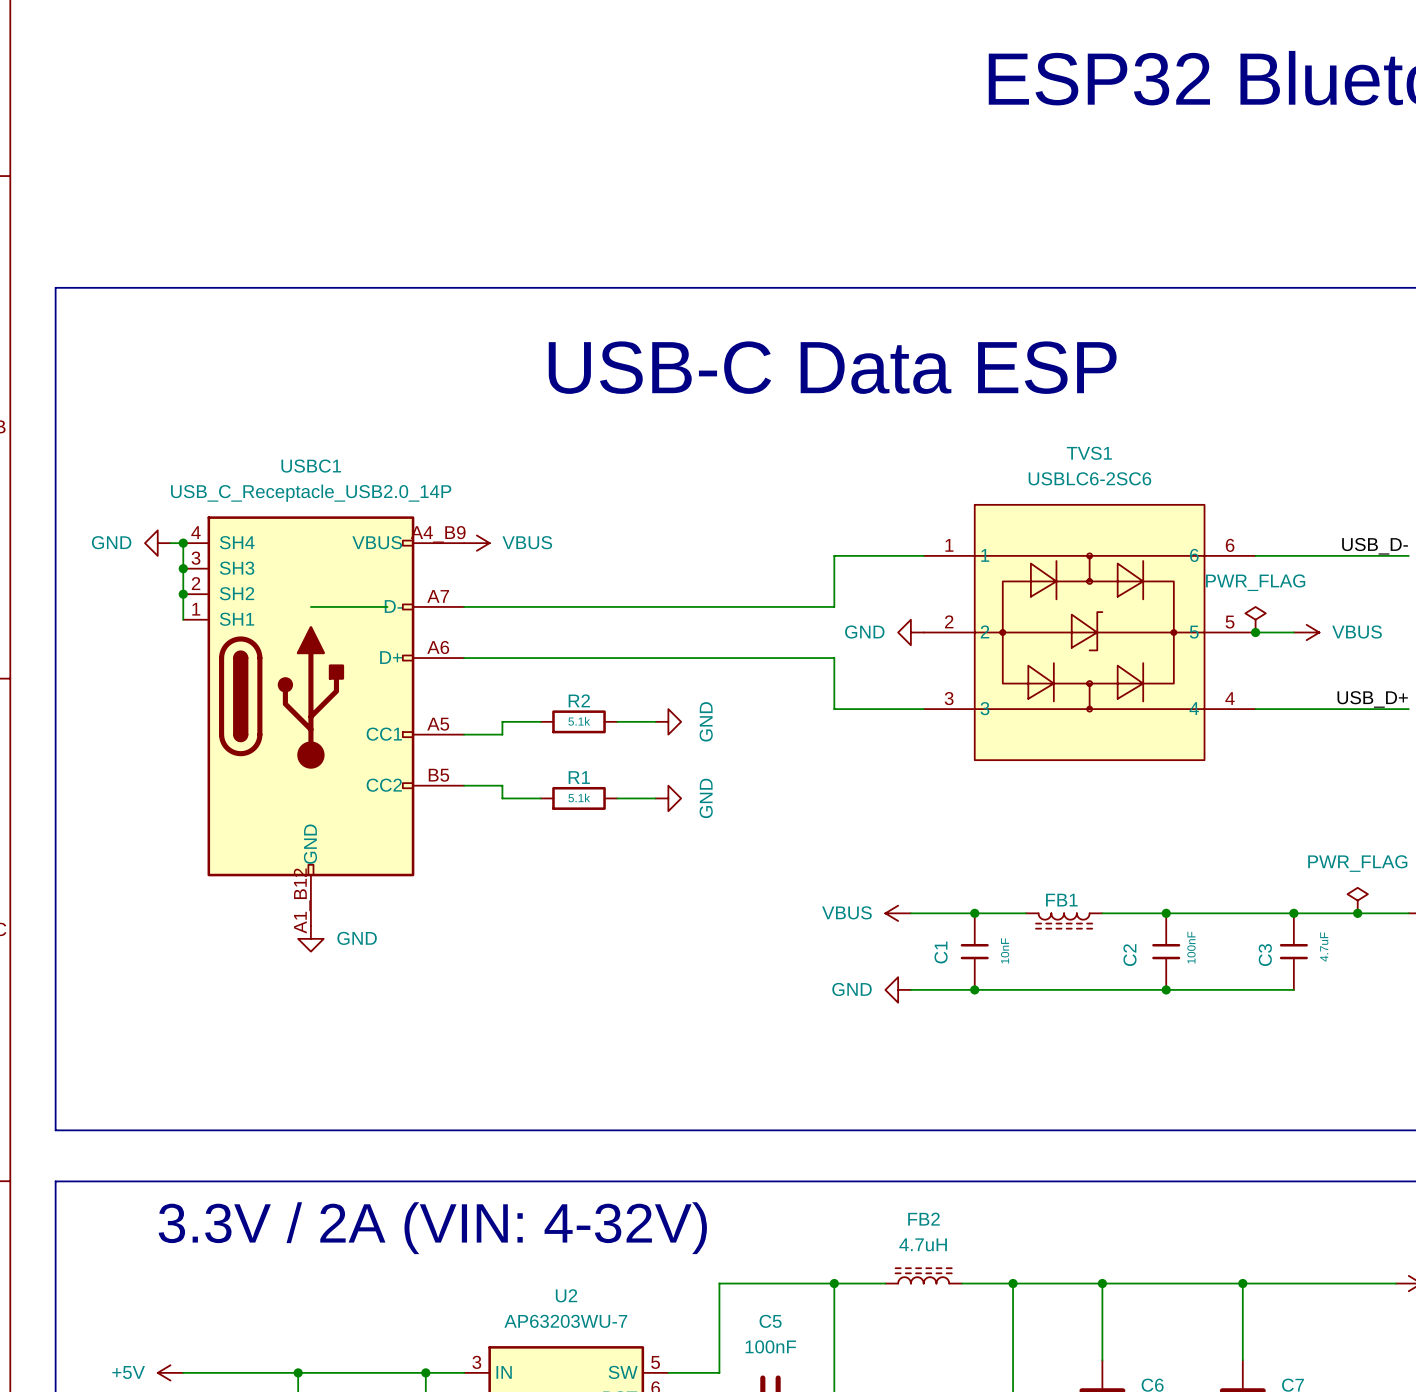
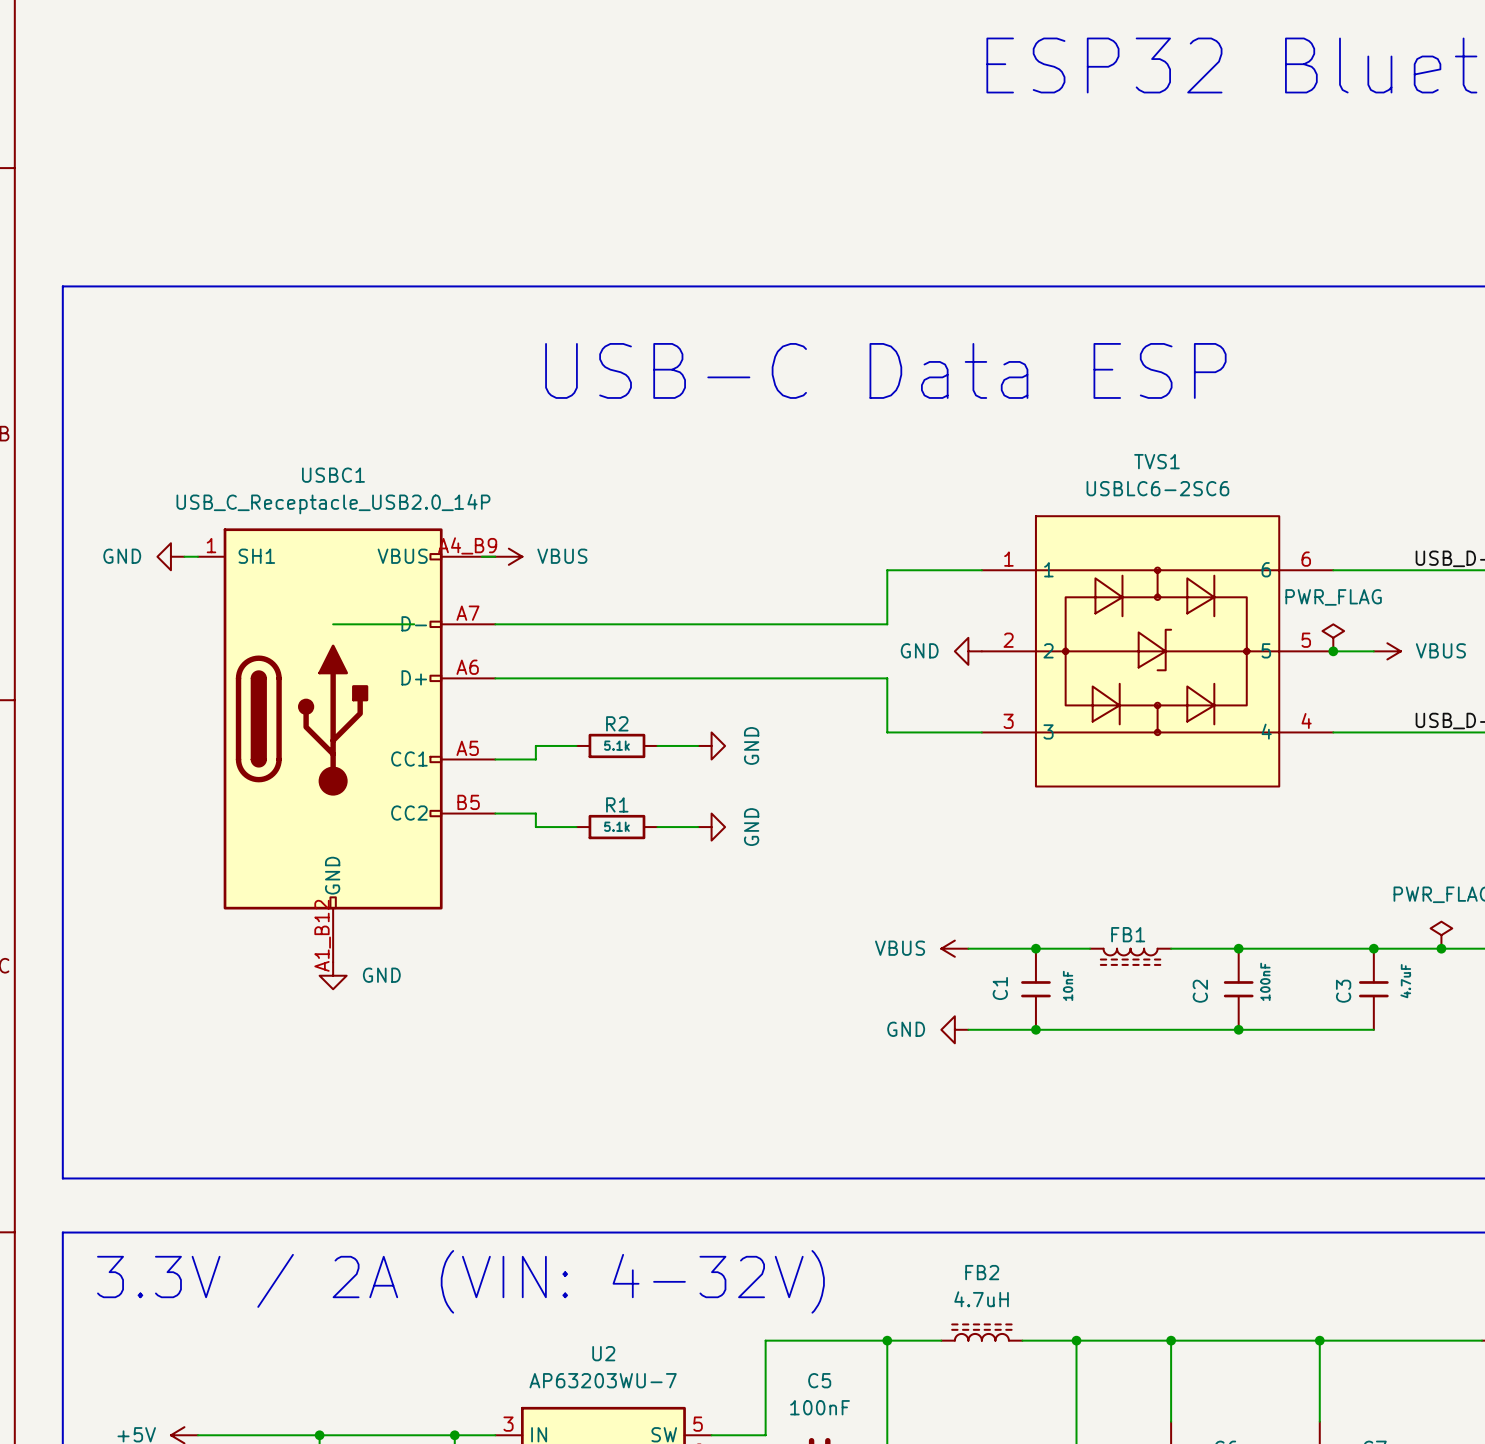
USBC1 symbol: [183, 516, 465, 927] -> [197, 528, 496, 963]
wire: (183, 543) (183, 619) -> none
junction: (183, 543) -> none
junction: (183, 568) -> none
junction: (183, 594) -> none

